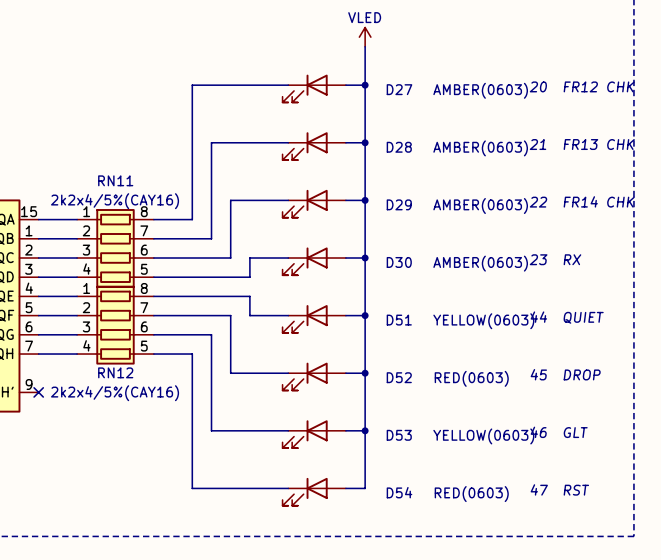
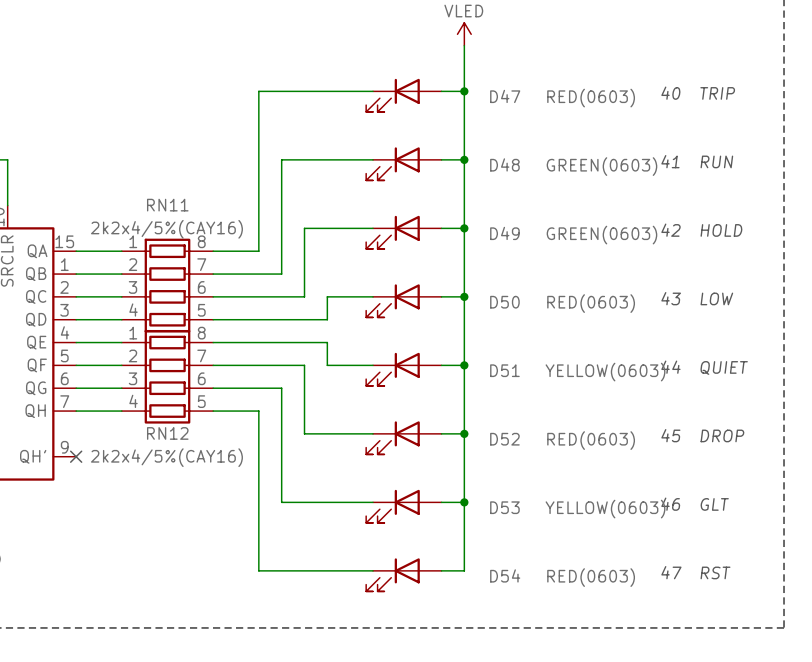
text: 20 FR12 CHK (582, 86) -> 40 TRIP (698, 93)
D27 name: D27 (399, 89) -> D47 (505, 96)
D27 value: AMBER(0603) (480, 90) -> RED(0603) (591, 98)
text: 21 FR13 CHK (582, 144) -> 41 RUN (697, 161)
D28 name: D28 (399, 147) -> D48 (504, 164)
D28 value: AMBER(0603) (480, 148) -> GREEN(0603) (601, 166)
text: 22 FR14 CHK (582, 201) -> 42 HOLD (701, 230)
D29 name: D29 (399, 204) -> D49 (504, 233)
D29 value: AMBER(0603) (480, 206) -> GREEN(0603) (601, 235)
text: 23 RX (555, 259) -> 43 LOW (697, 298)
D30 name: D30 (399, 262) -> D50 (504, 302)
D30 value: AMBER(0603) (480, 263) -> RED(0603) (591, 303)

